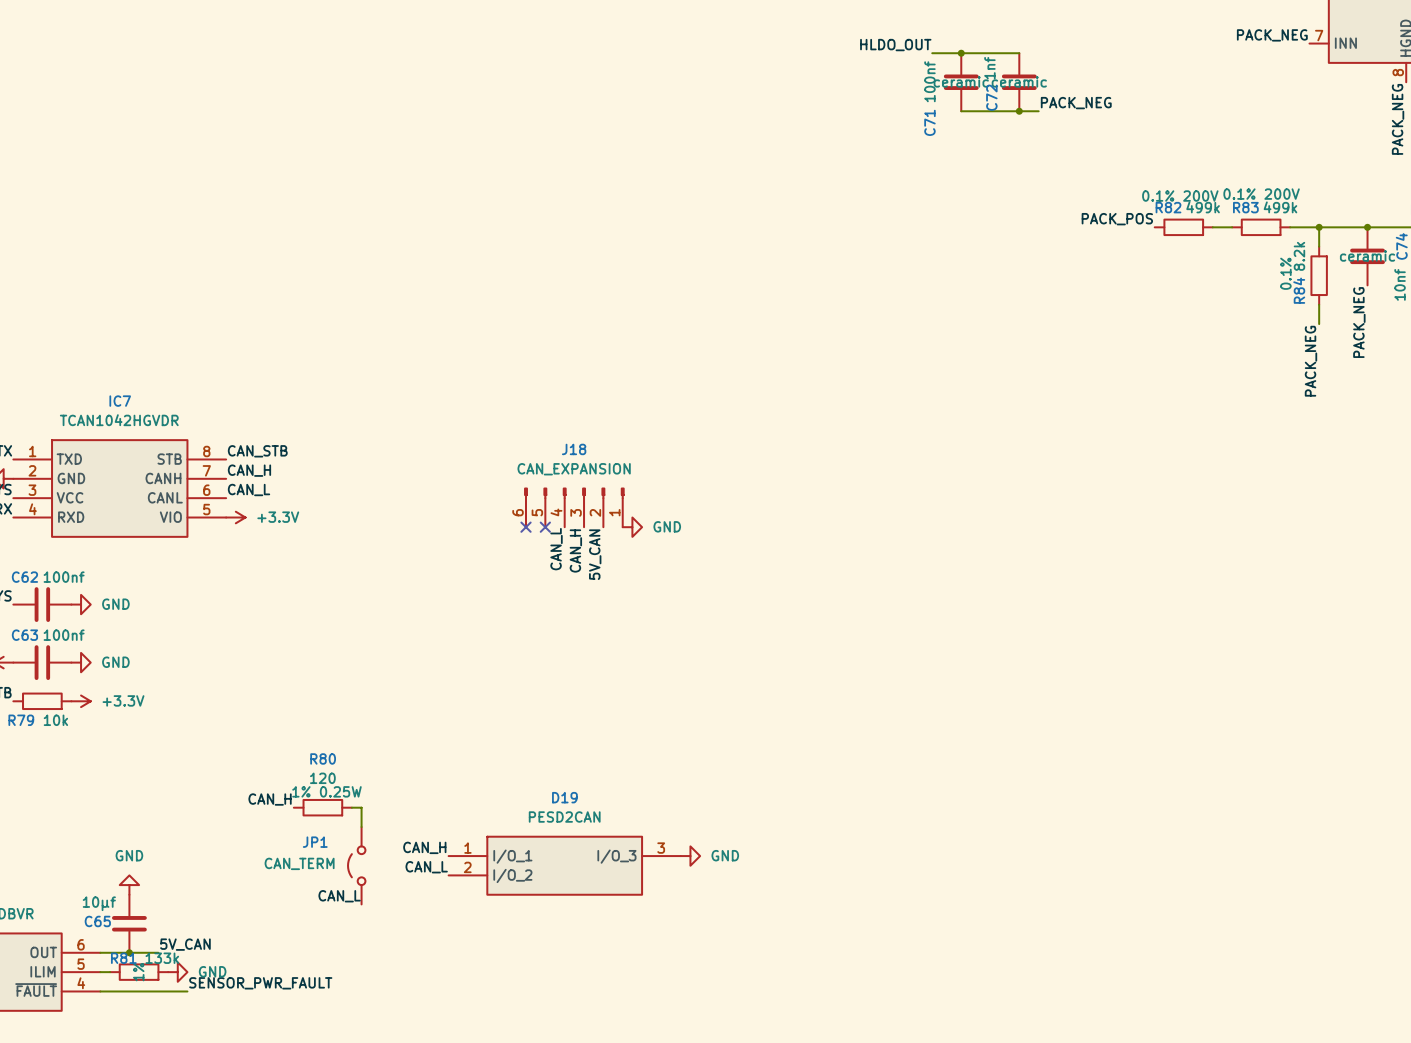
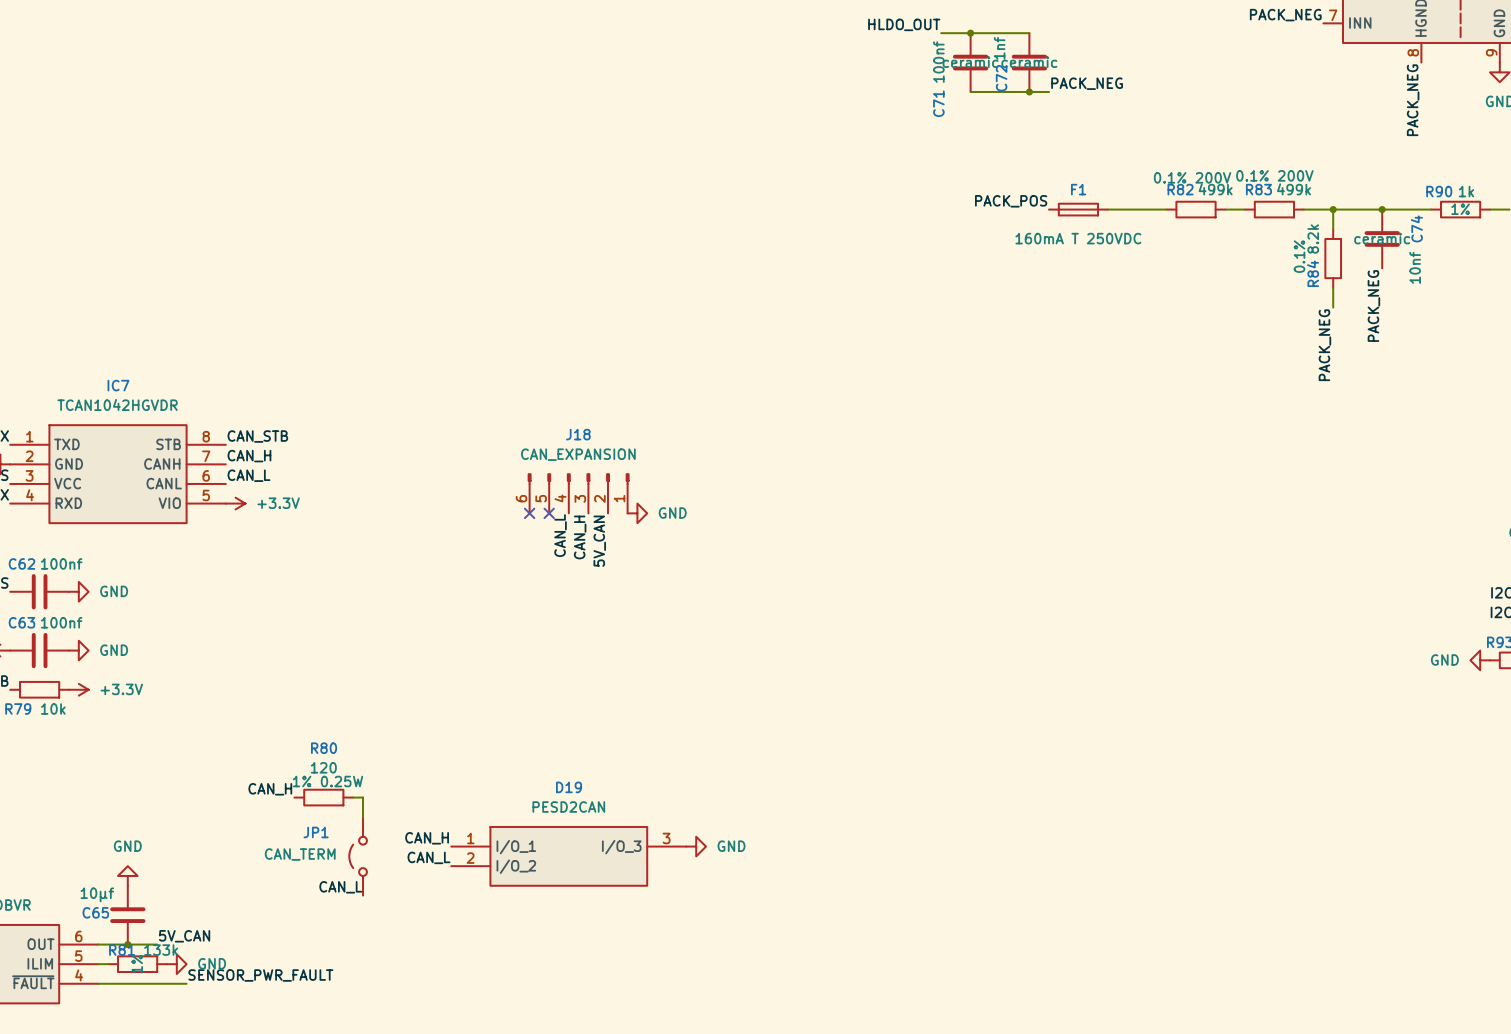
label position: PACK_POS (1117, 219) -> PACK_POS (1011, 201)
F1: none -> 160mA T 250VDC (1078, 209)
wire: none -> (1107, 209) (1166, 209)

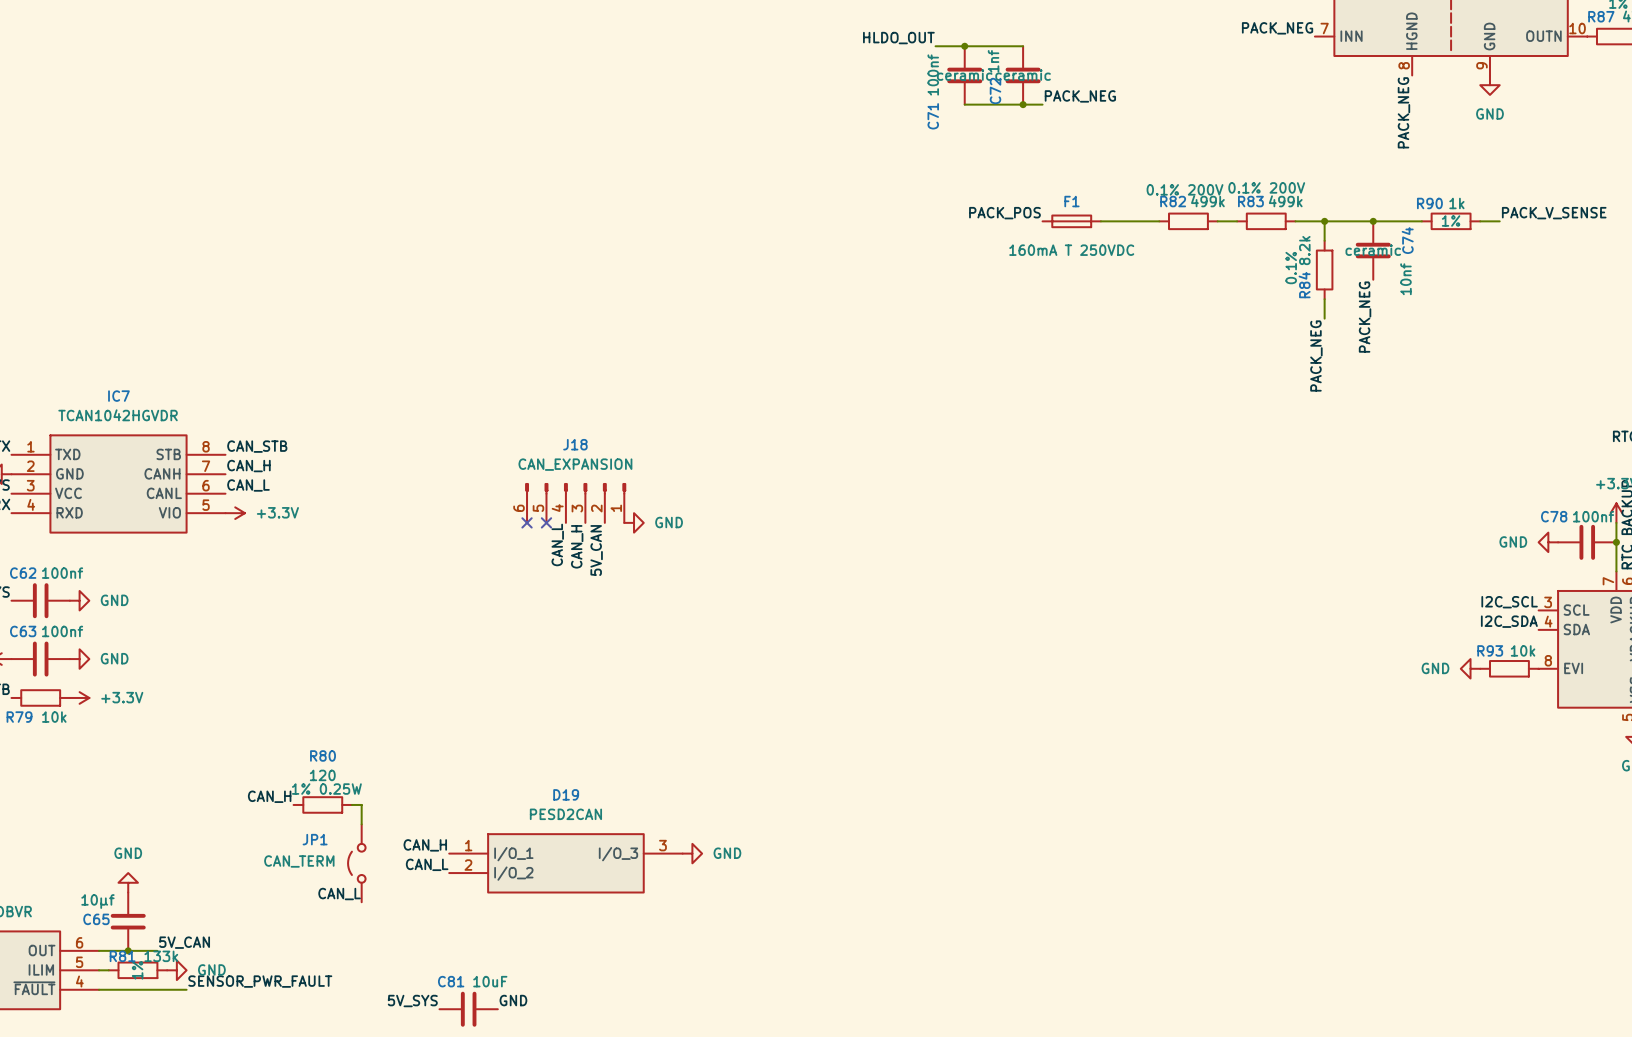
label: none -> GND (513, 1000)
label: none -> 5V_SYS (412, 1001)
C81: none -> 10uF (468, 1009)

